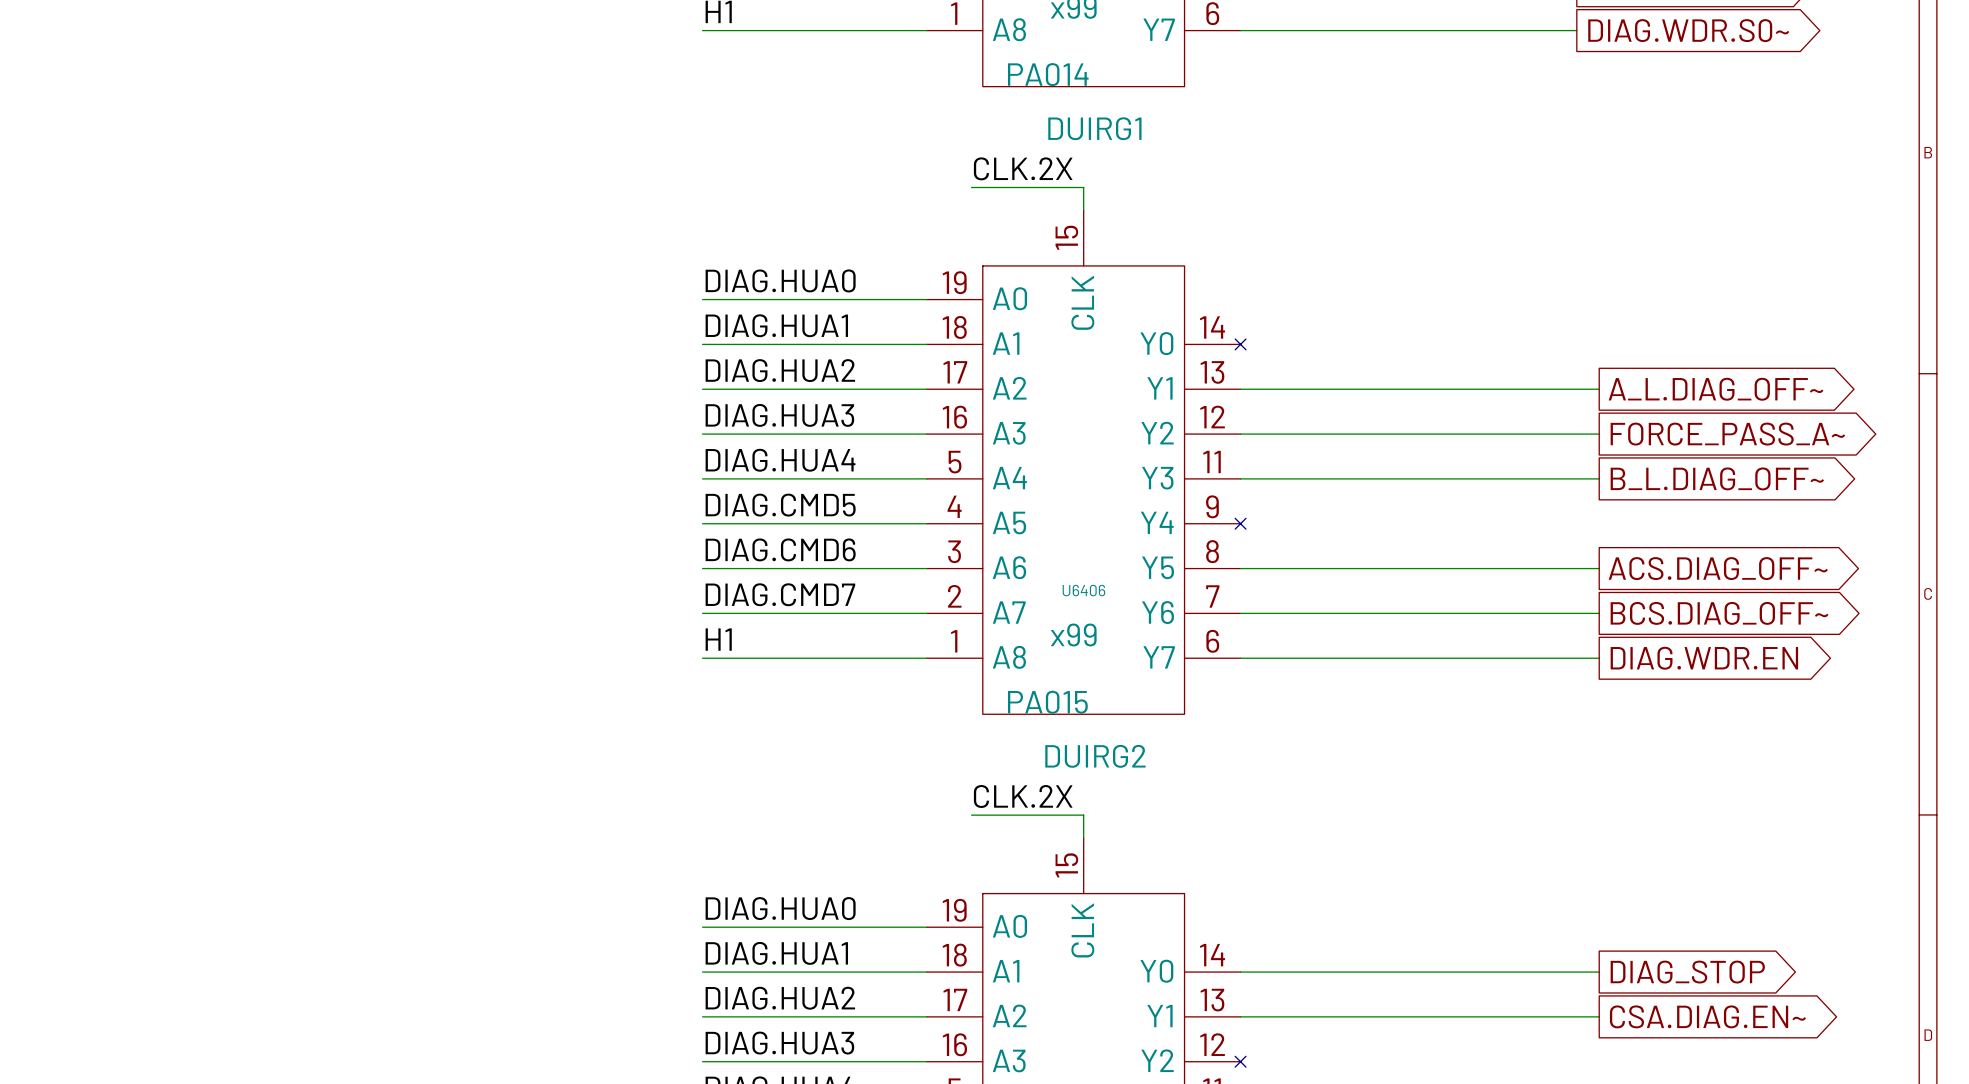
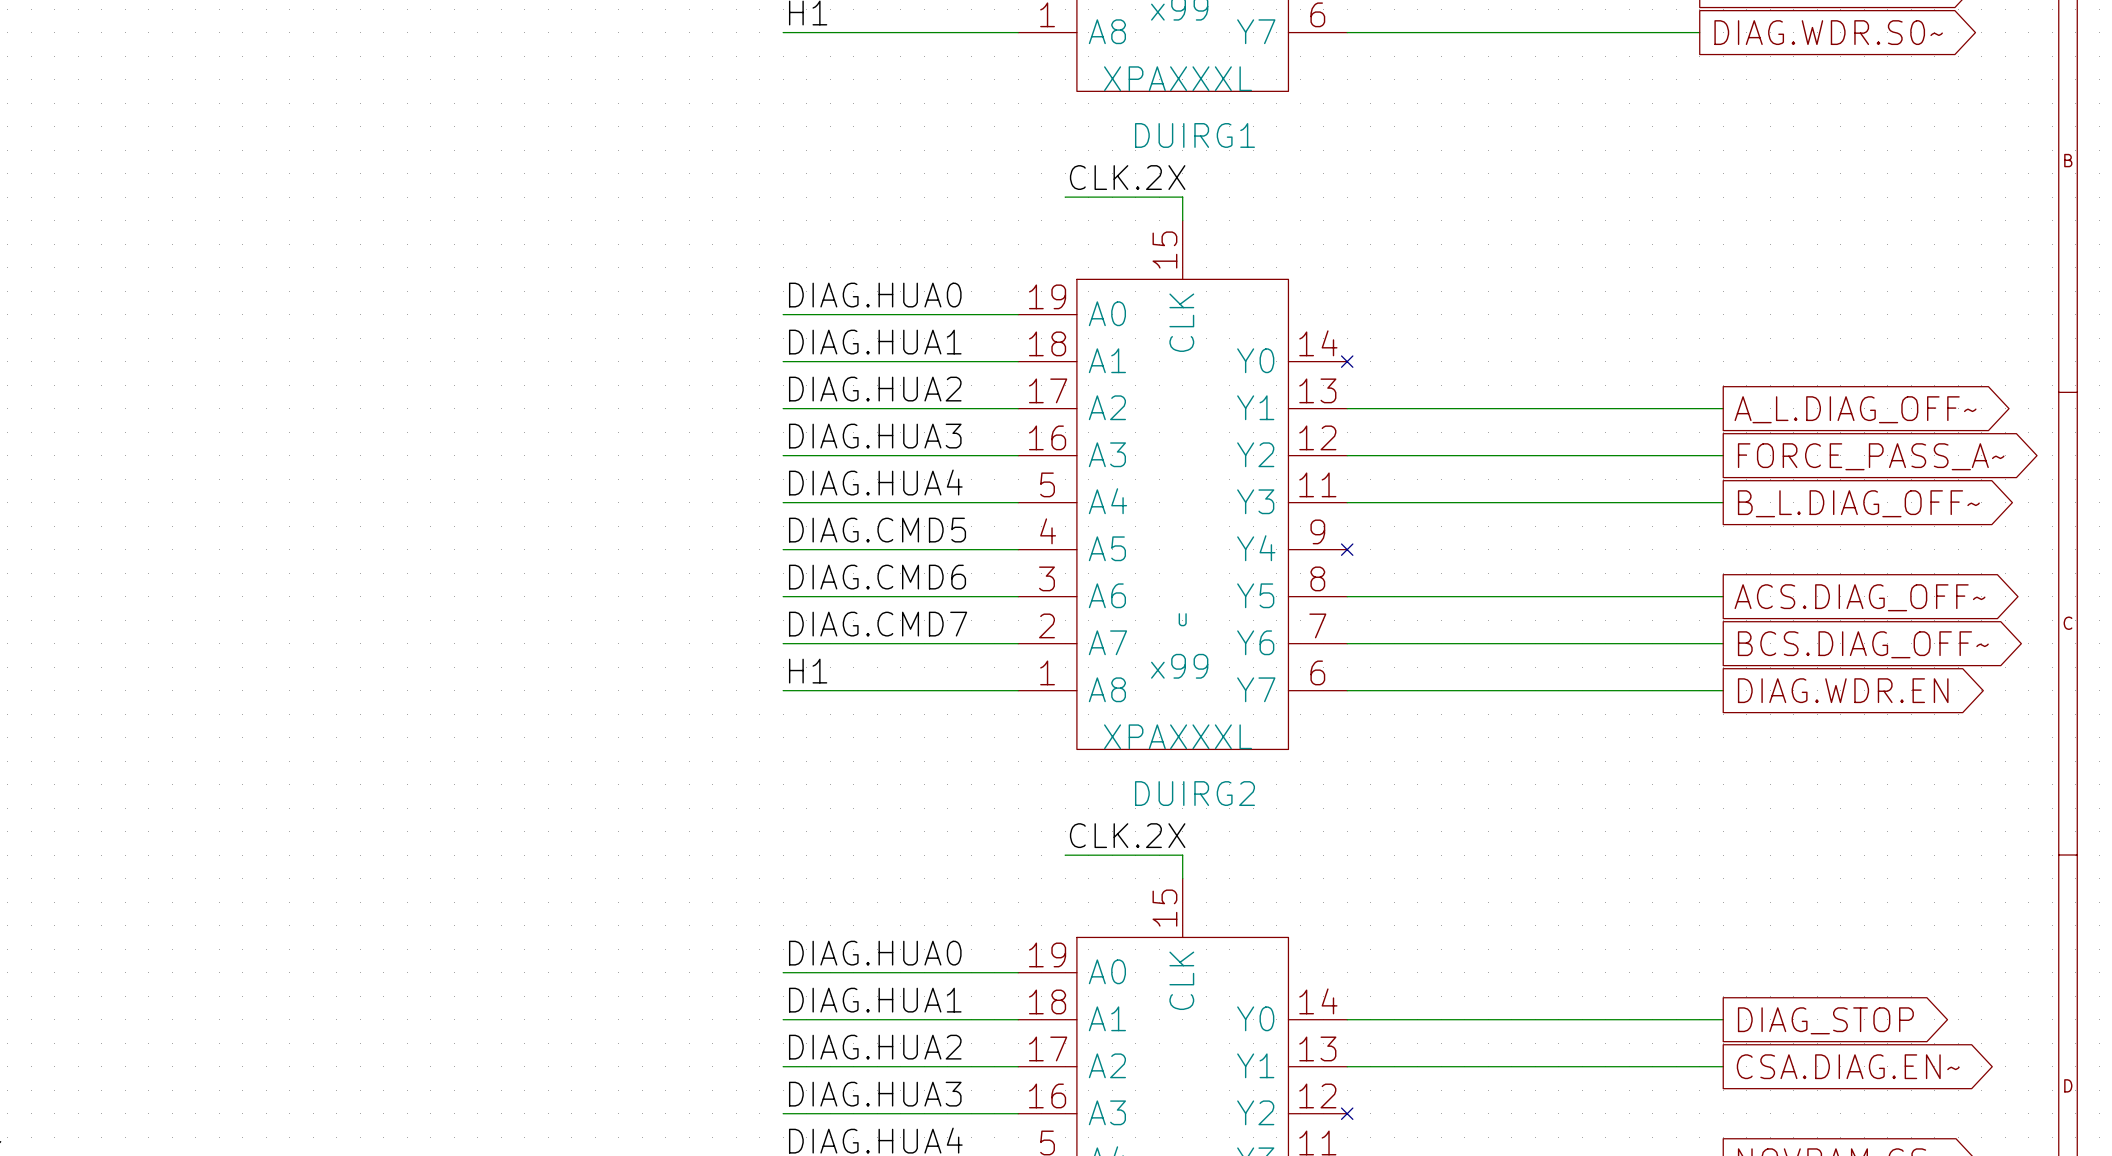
part value: PA014 (1048, 74) -> XPAXXXL (1178, 78)
U6406 name: U6406 (1083, 590) -> U (1182, 619)
U6406 value: PA015 (1047, 702) -> XPAXXXL (1178, 736)

